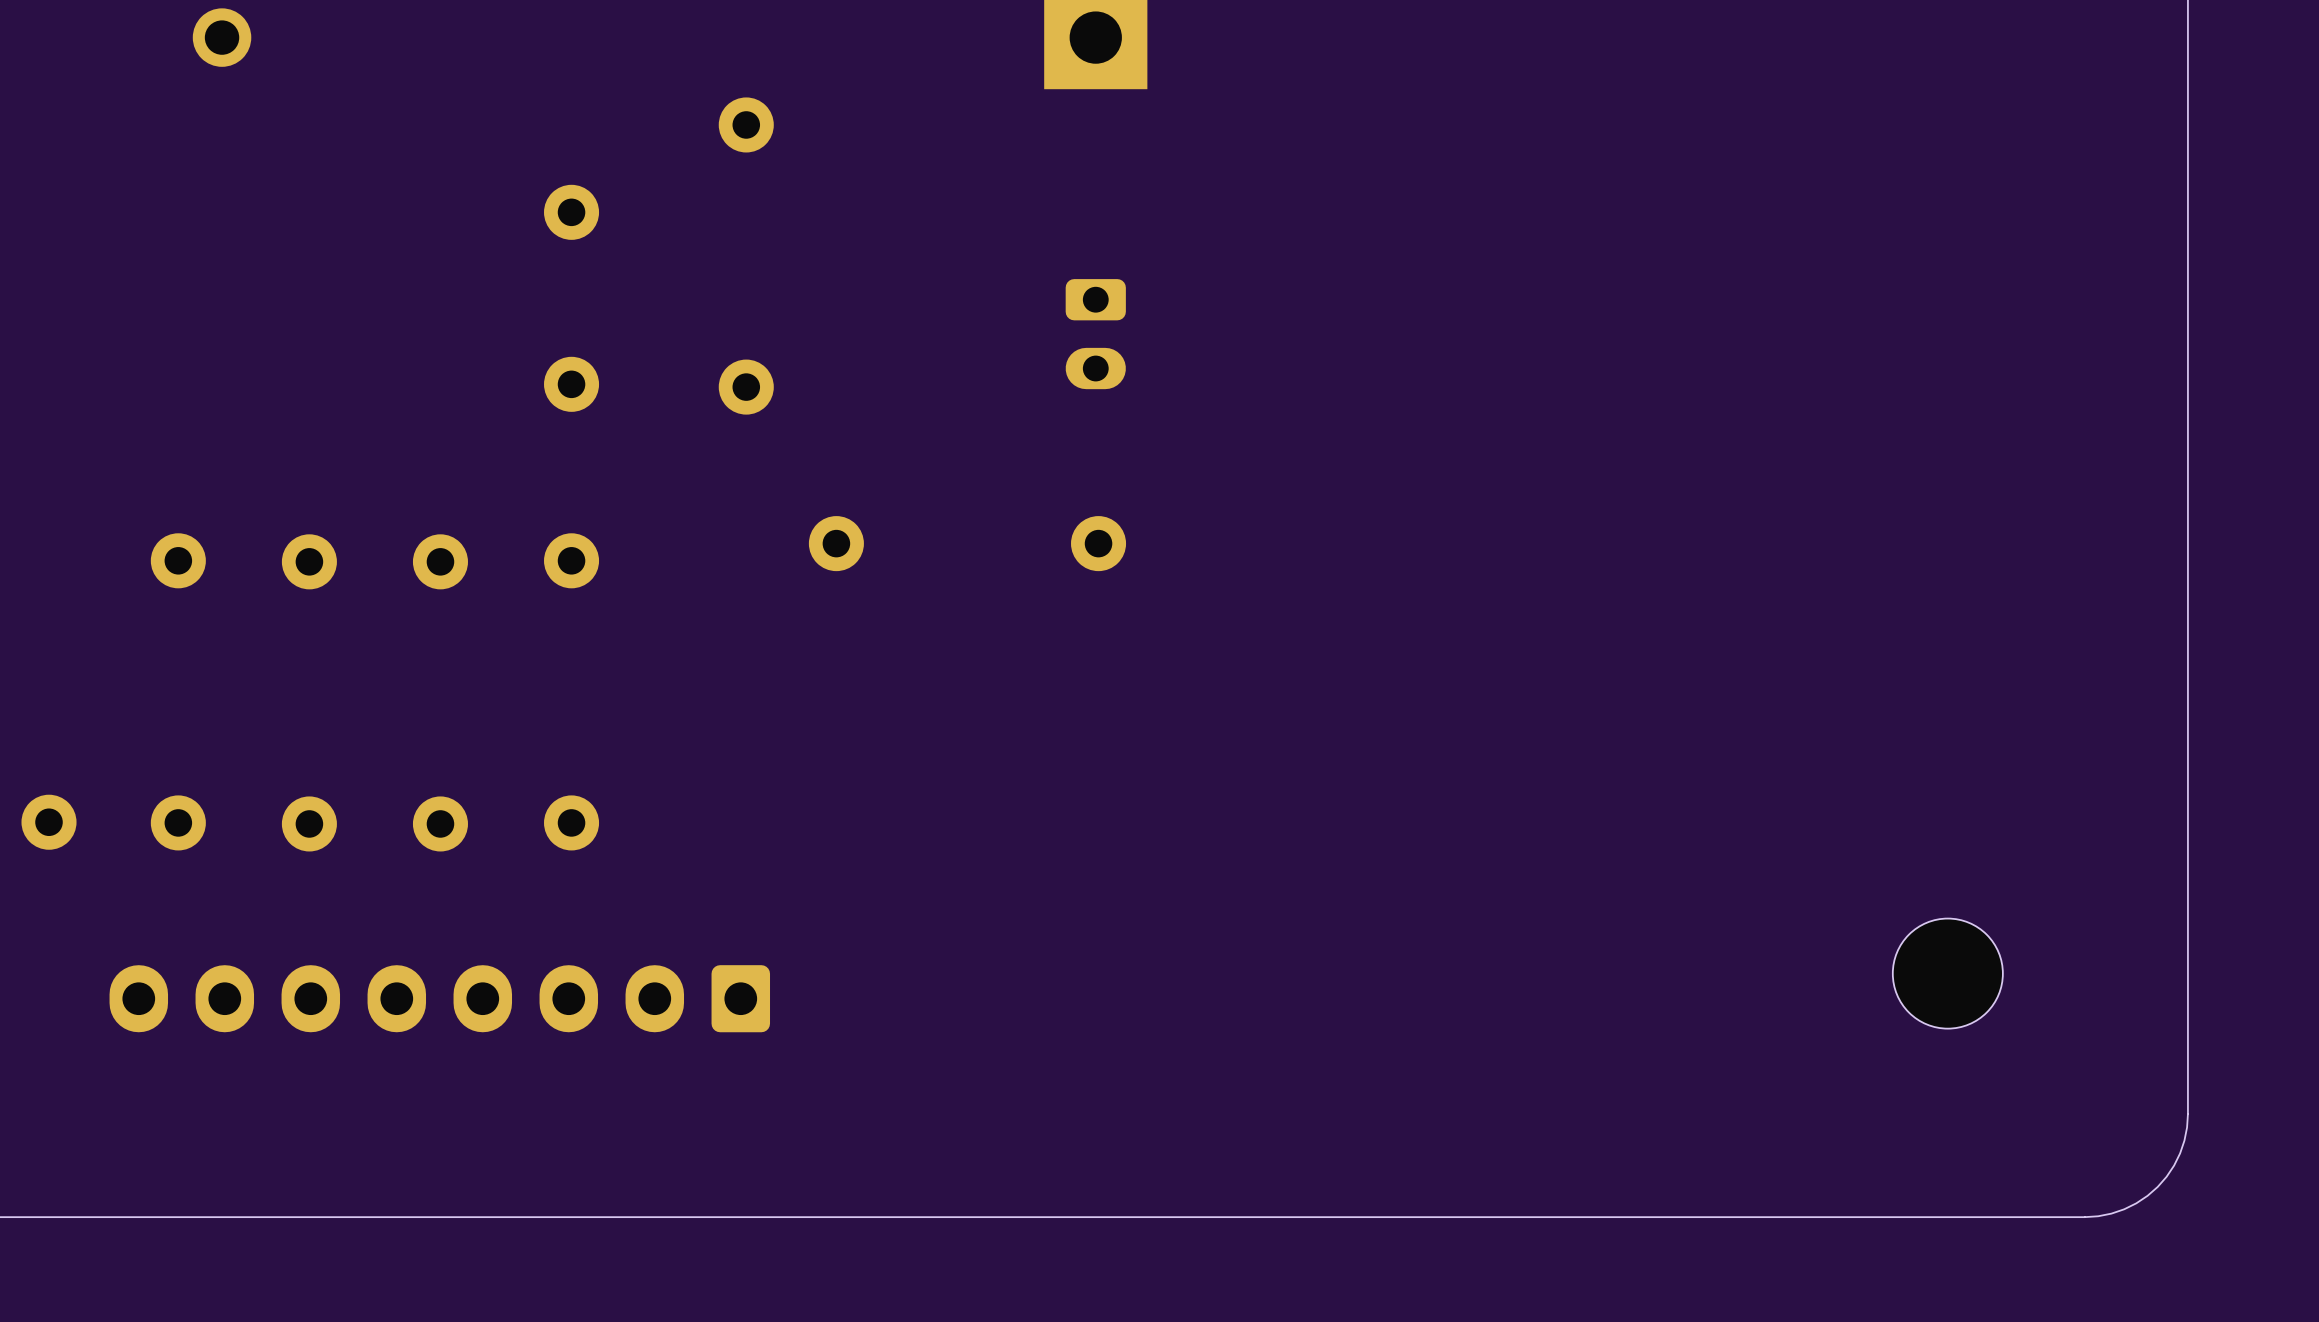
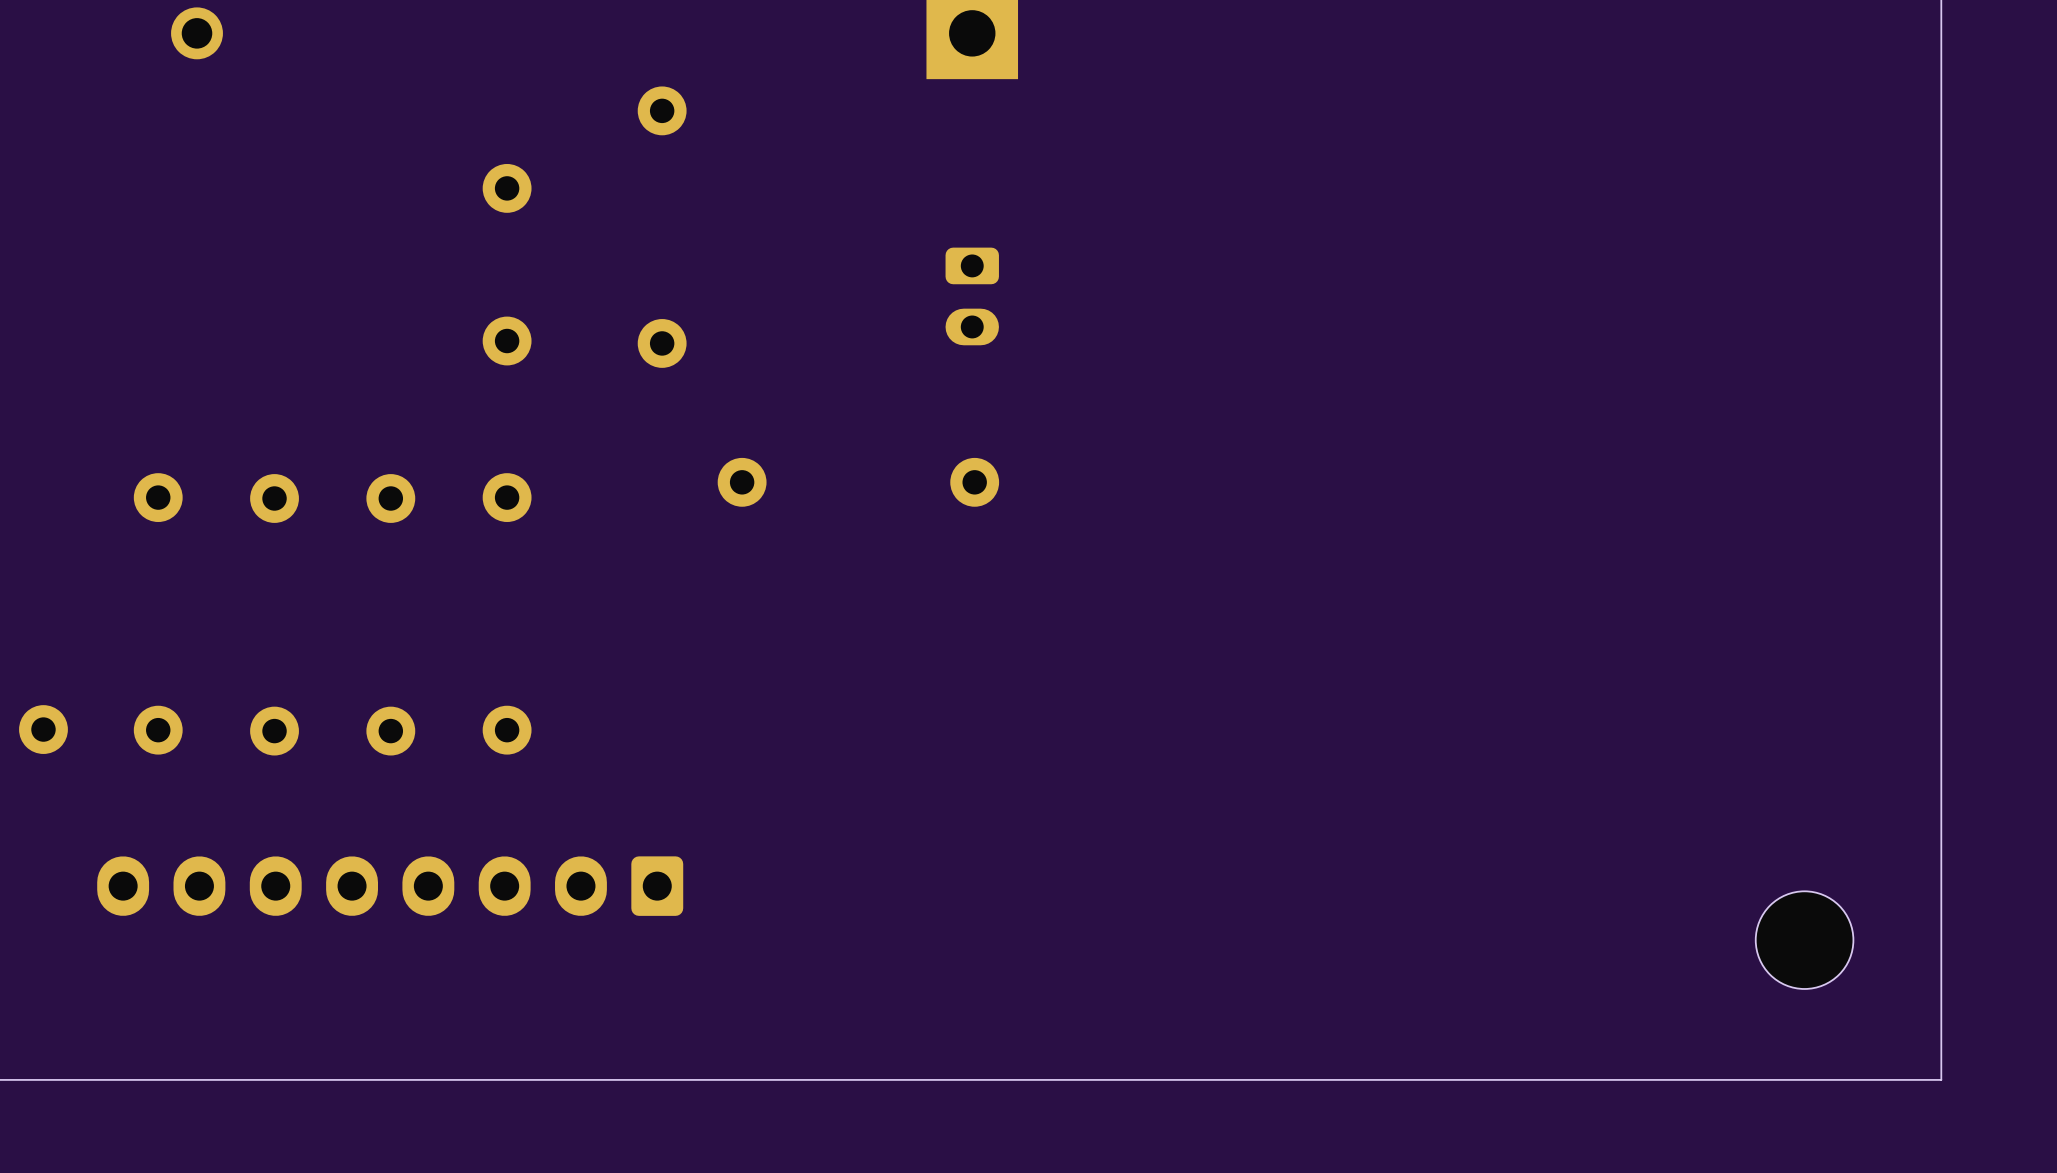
part position: (1947, 973) -> (1804, 940)
board edge: (2187, 1113) (2184, 1140) (2180, 1153) (2166, 1176) (2157, 1186) (2136, 1203) (2124, 1209) (2111, 1213) (2084, 1217) -> (1941, 988) (1941, 1079) (1849, 1079)

